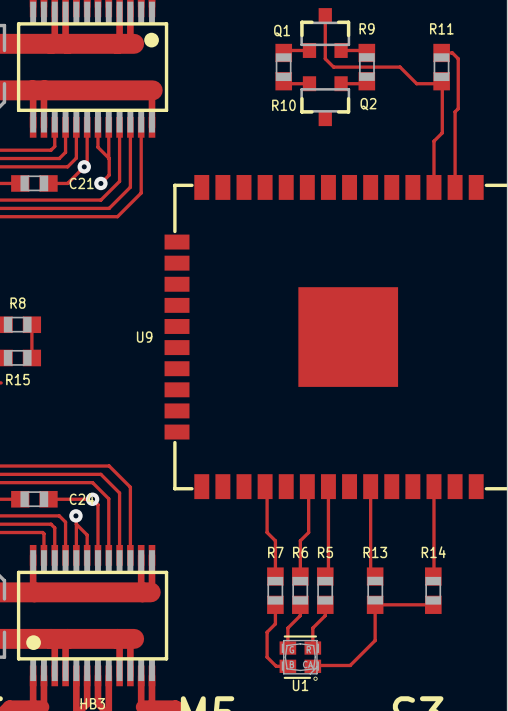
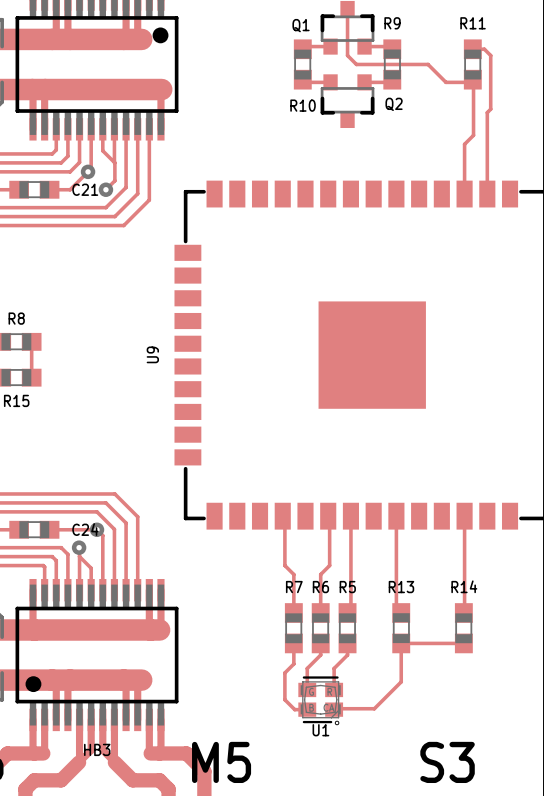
U9 name rotation: 0° (144, 337) -> 90° counterclockwise (152, 354)

